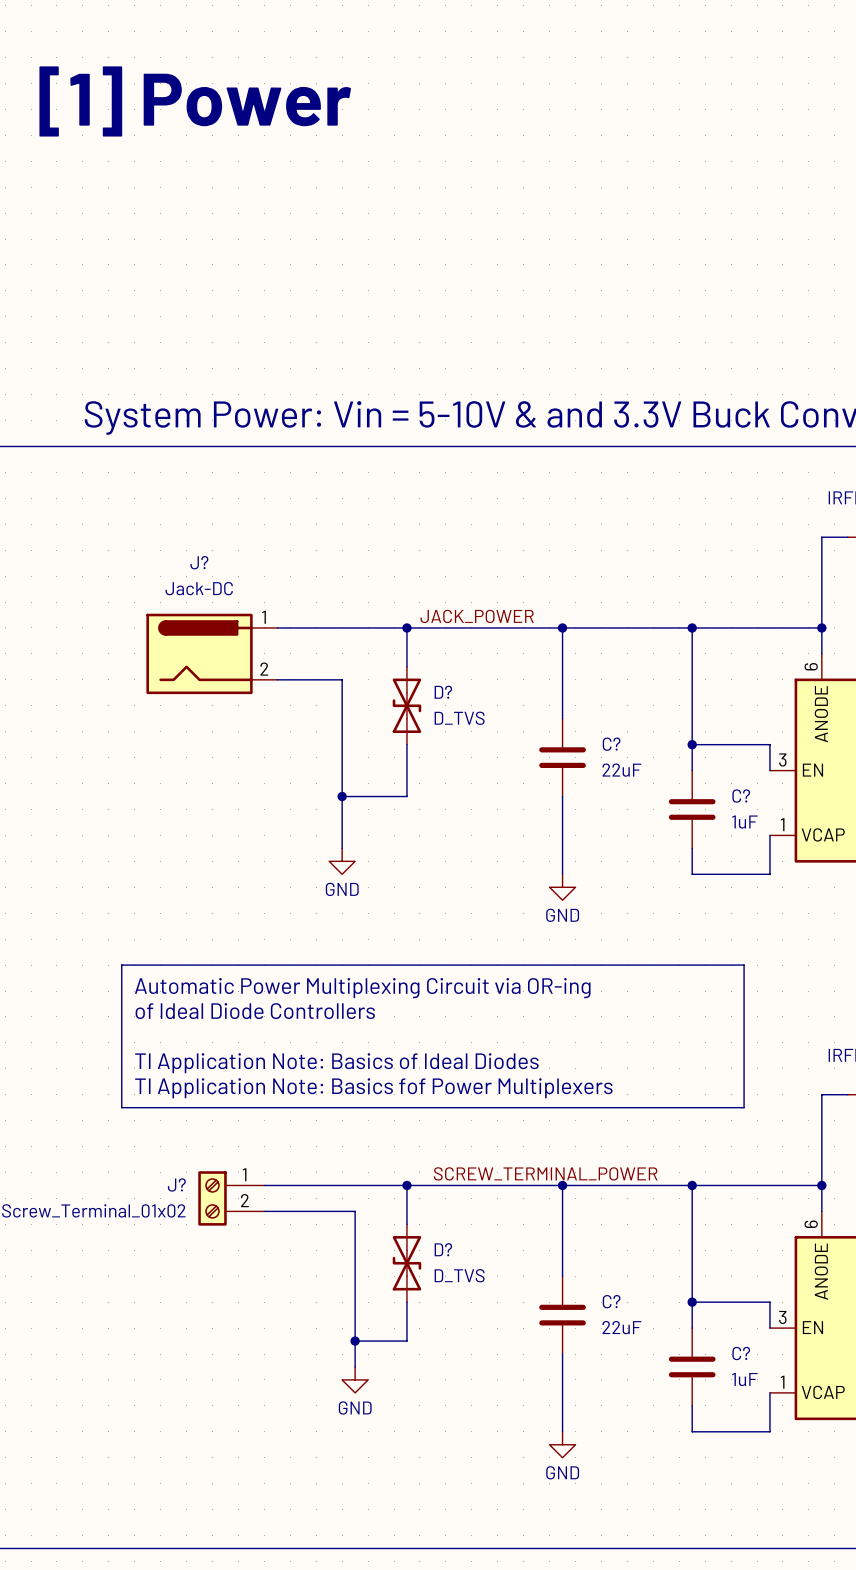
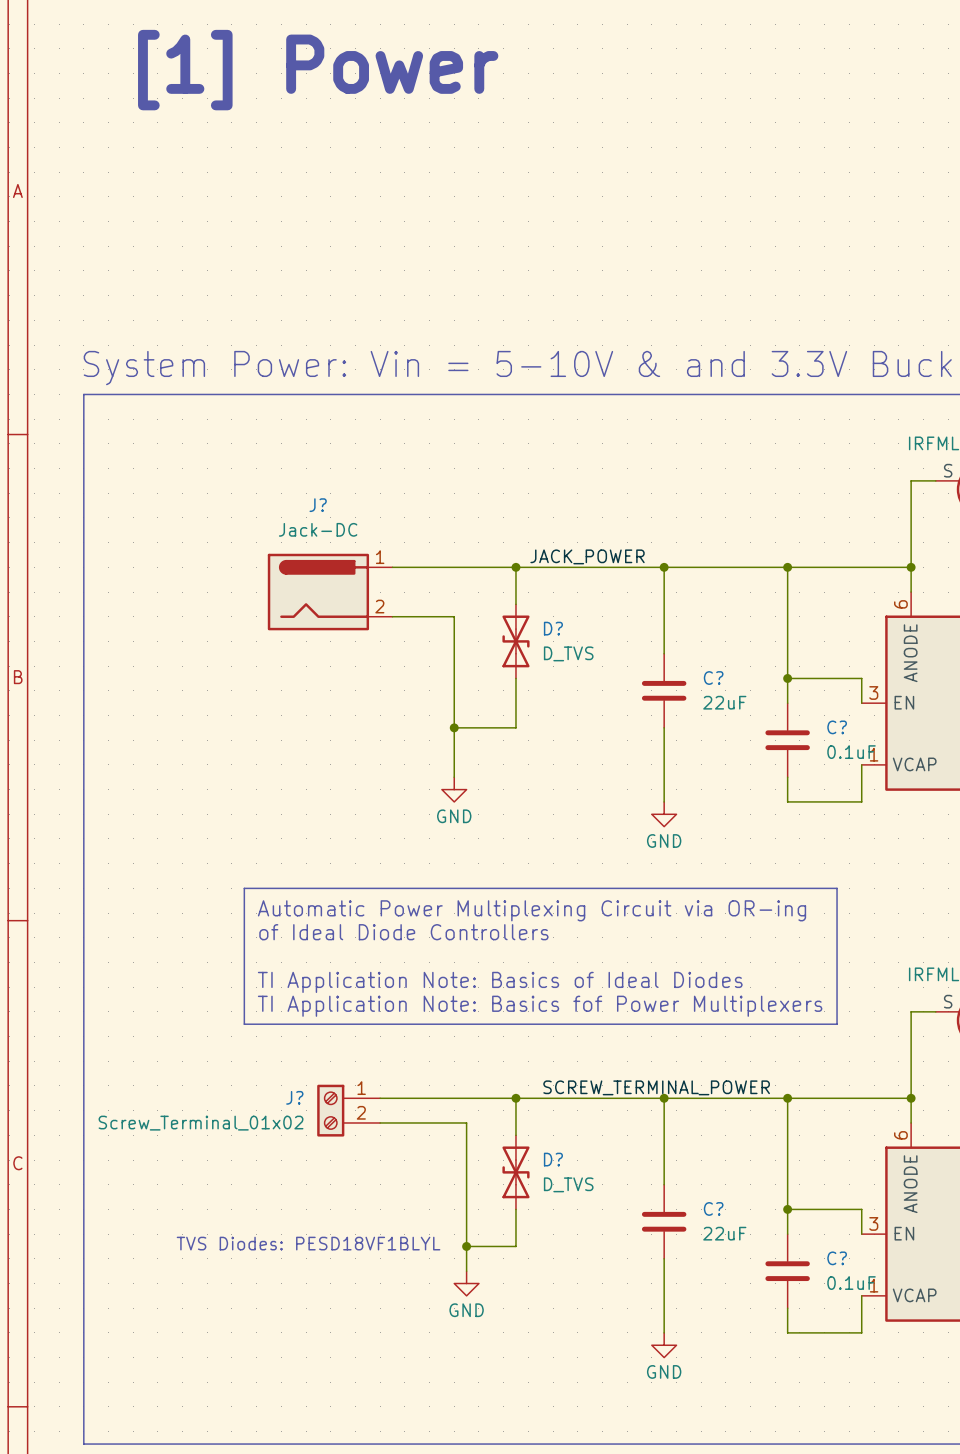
C? value: 1uF (744, 822) -> 0.1uF (851, 752)
text: none -> TVS Diodes: PESD18VF1BLYL (308, 1243)
C? value: 1uF (744, 1379) -> 0.1uF (851, 1283)

